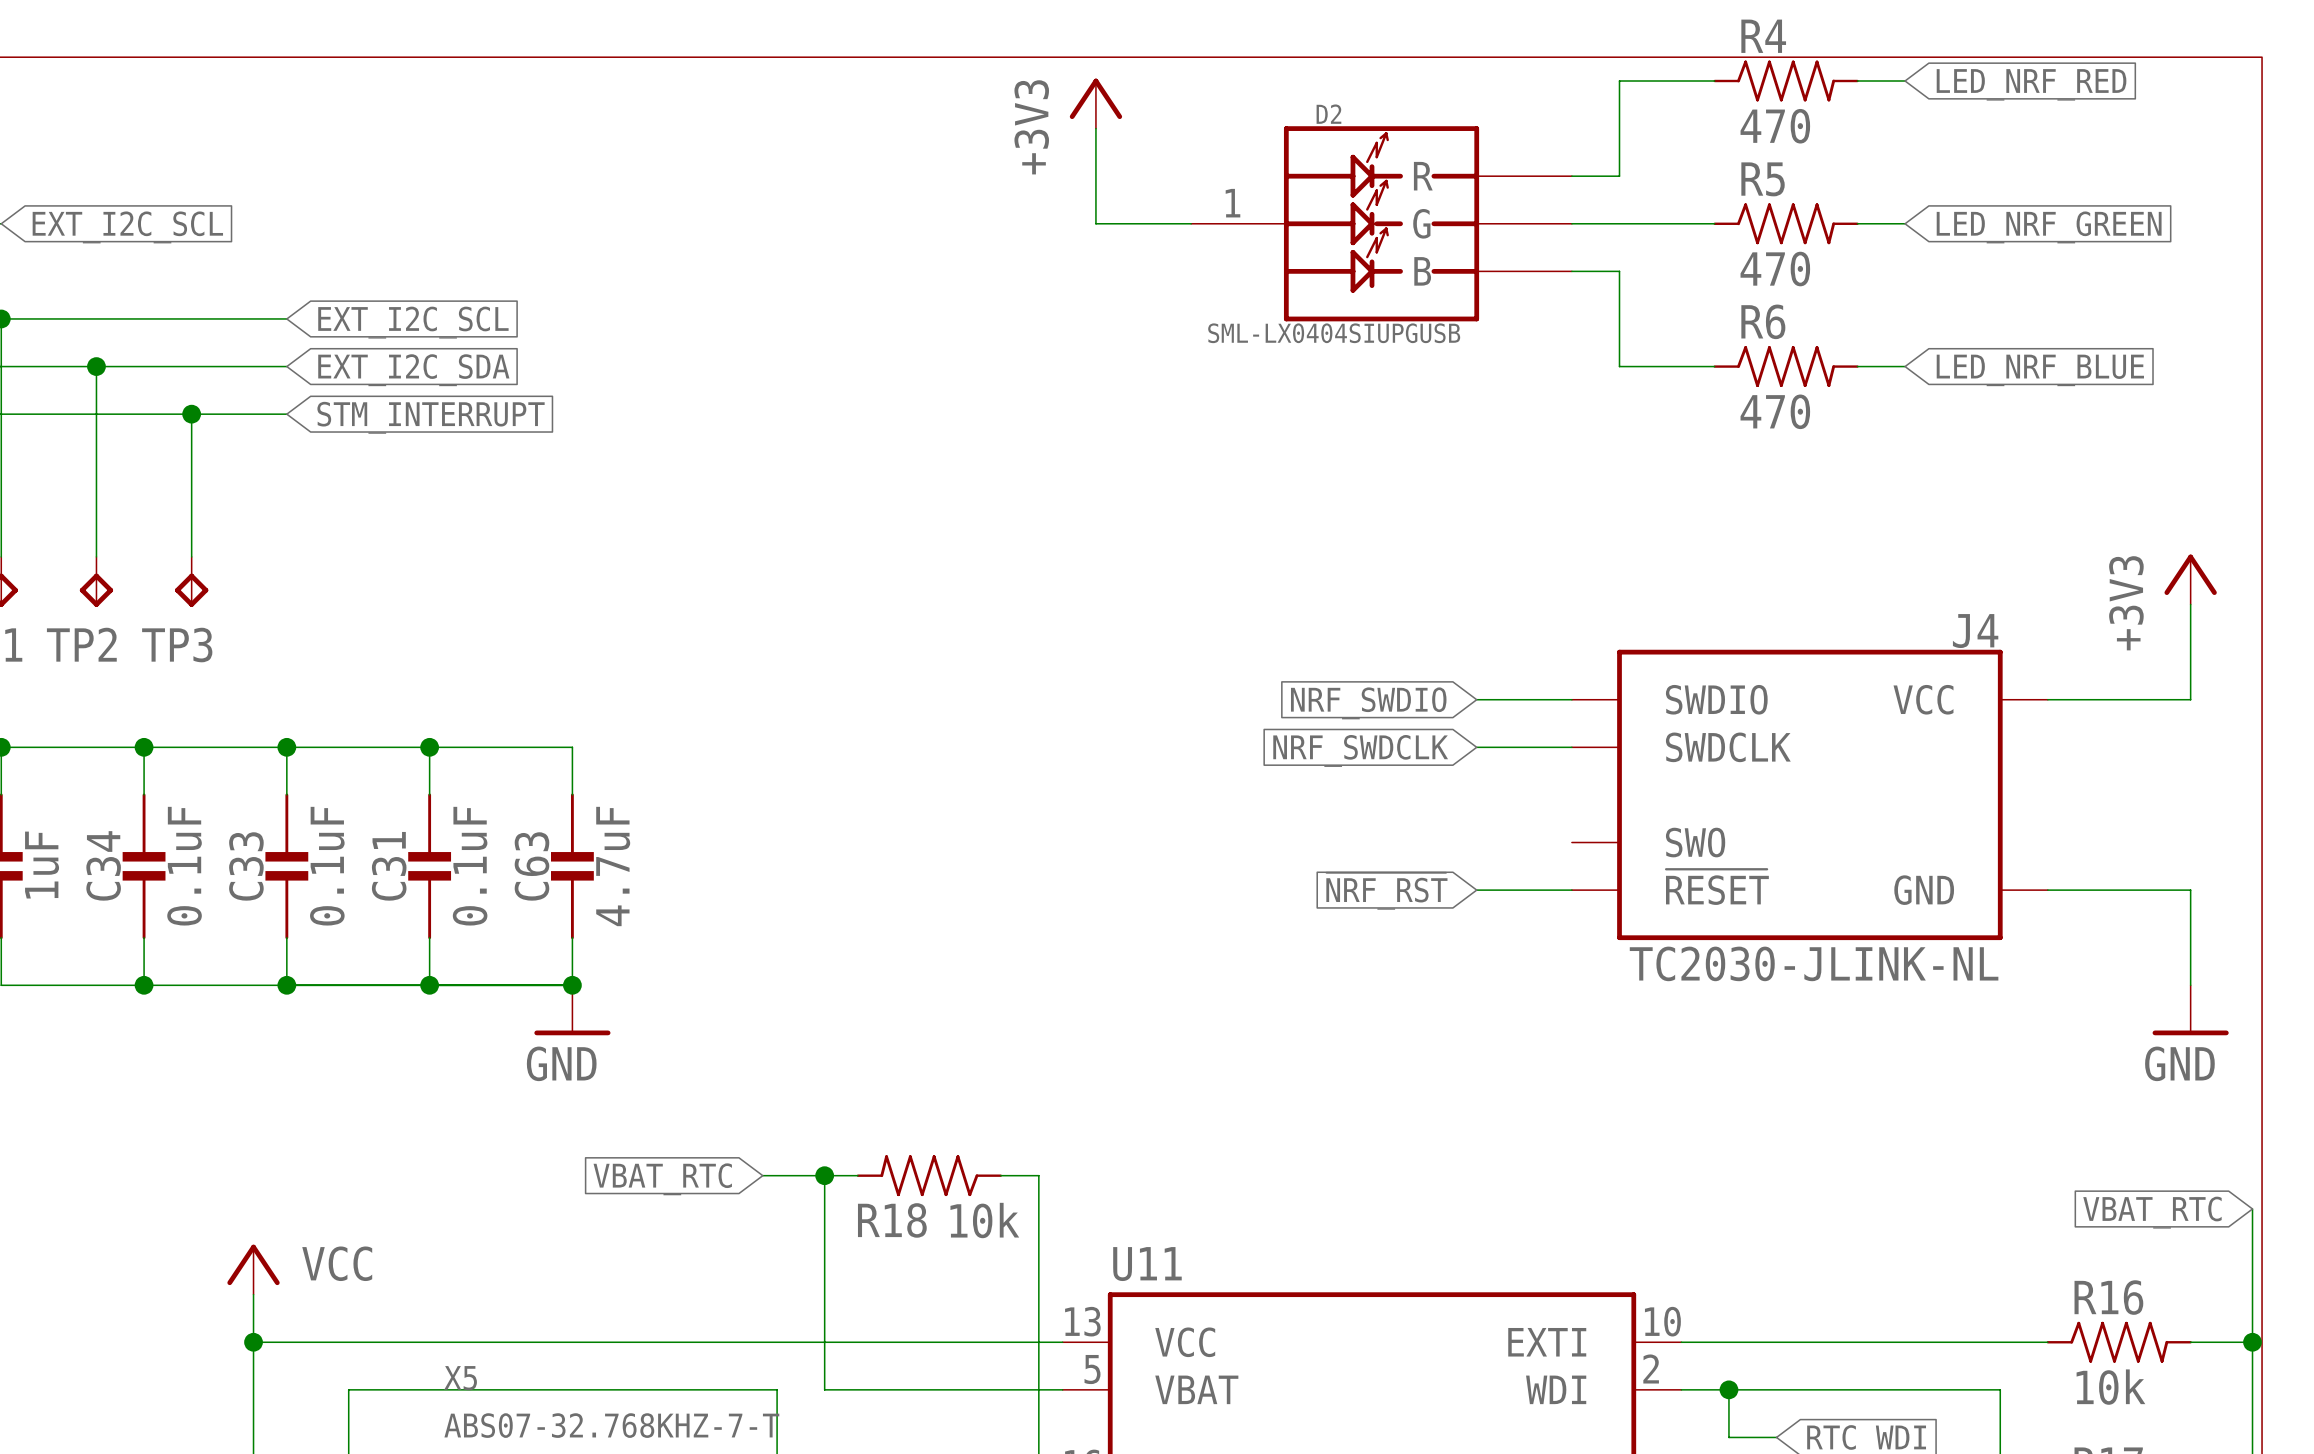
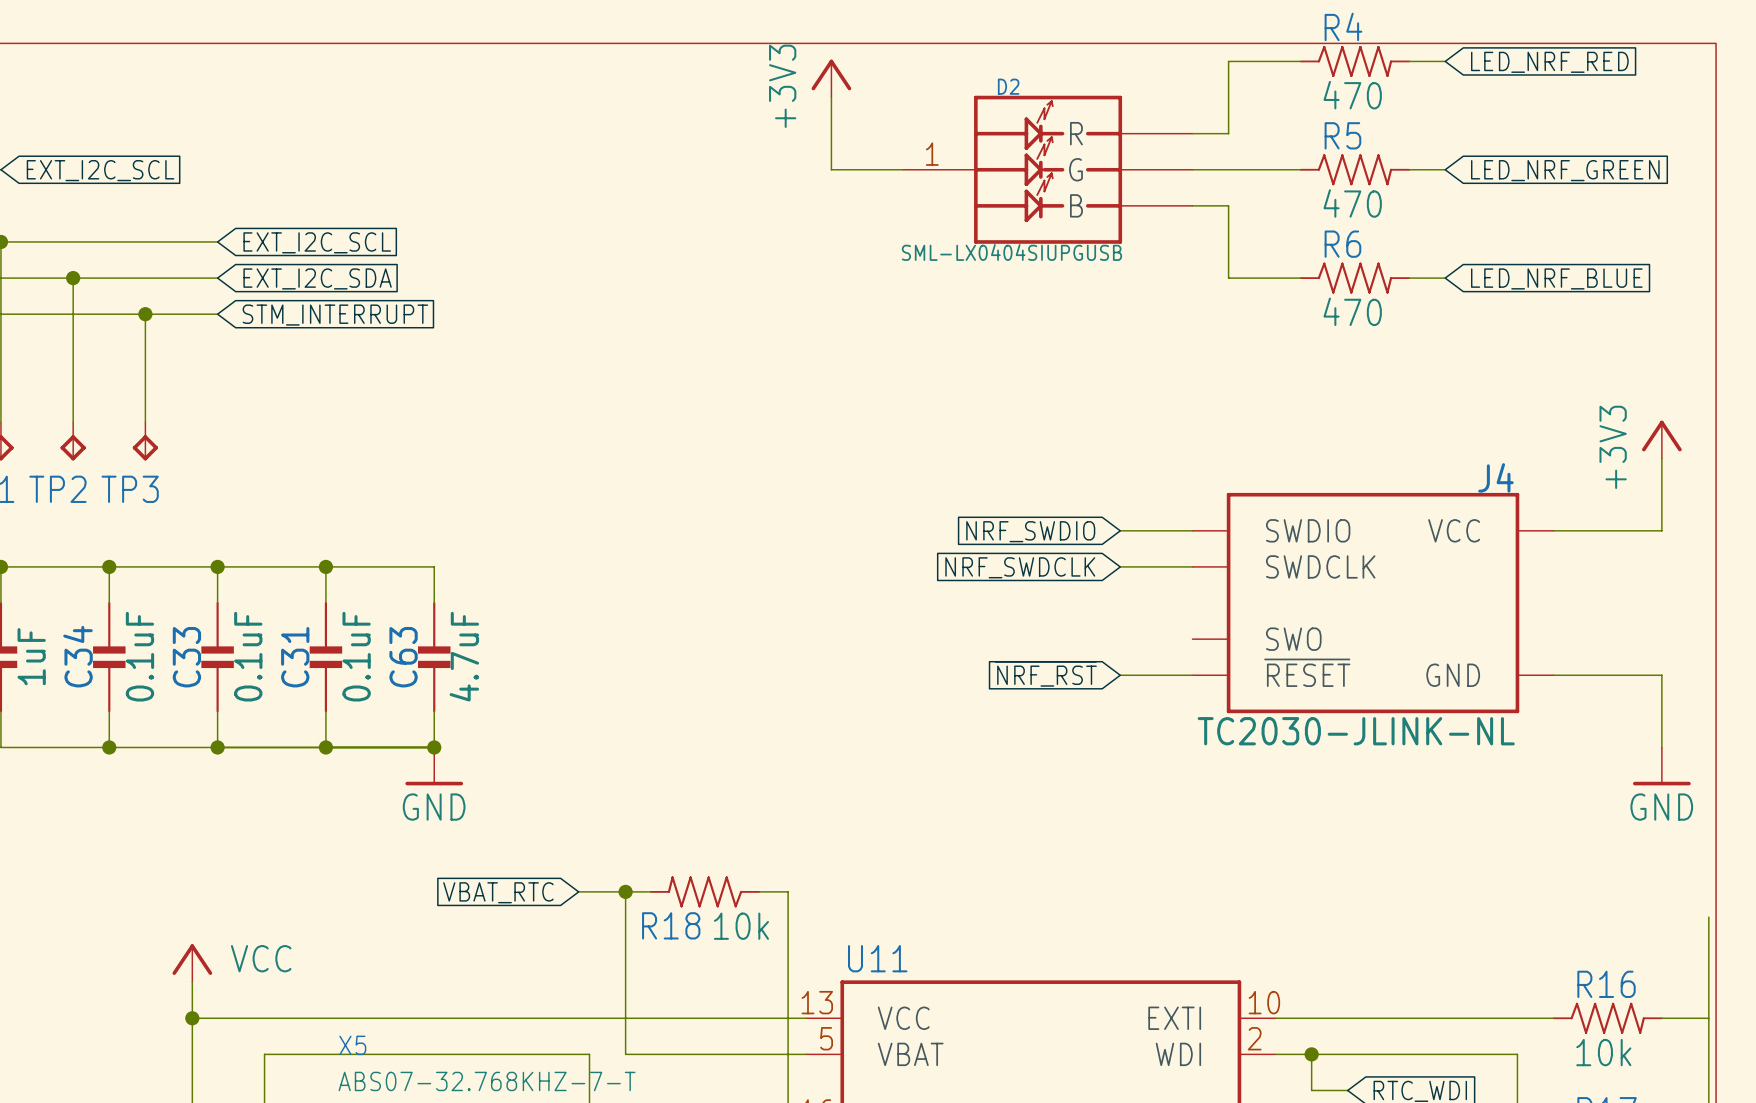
global label: VBAT_RTC (2152, 1212) -> none
junction: (2252, 1342) -> none

